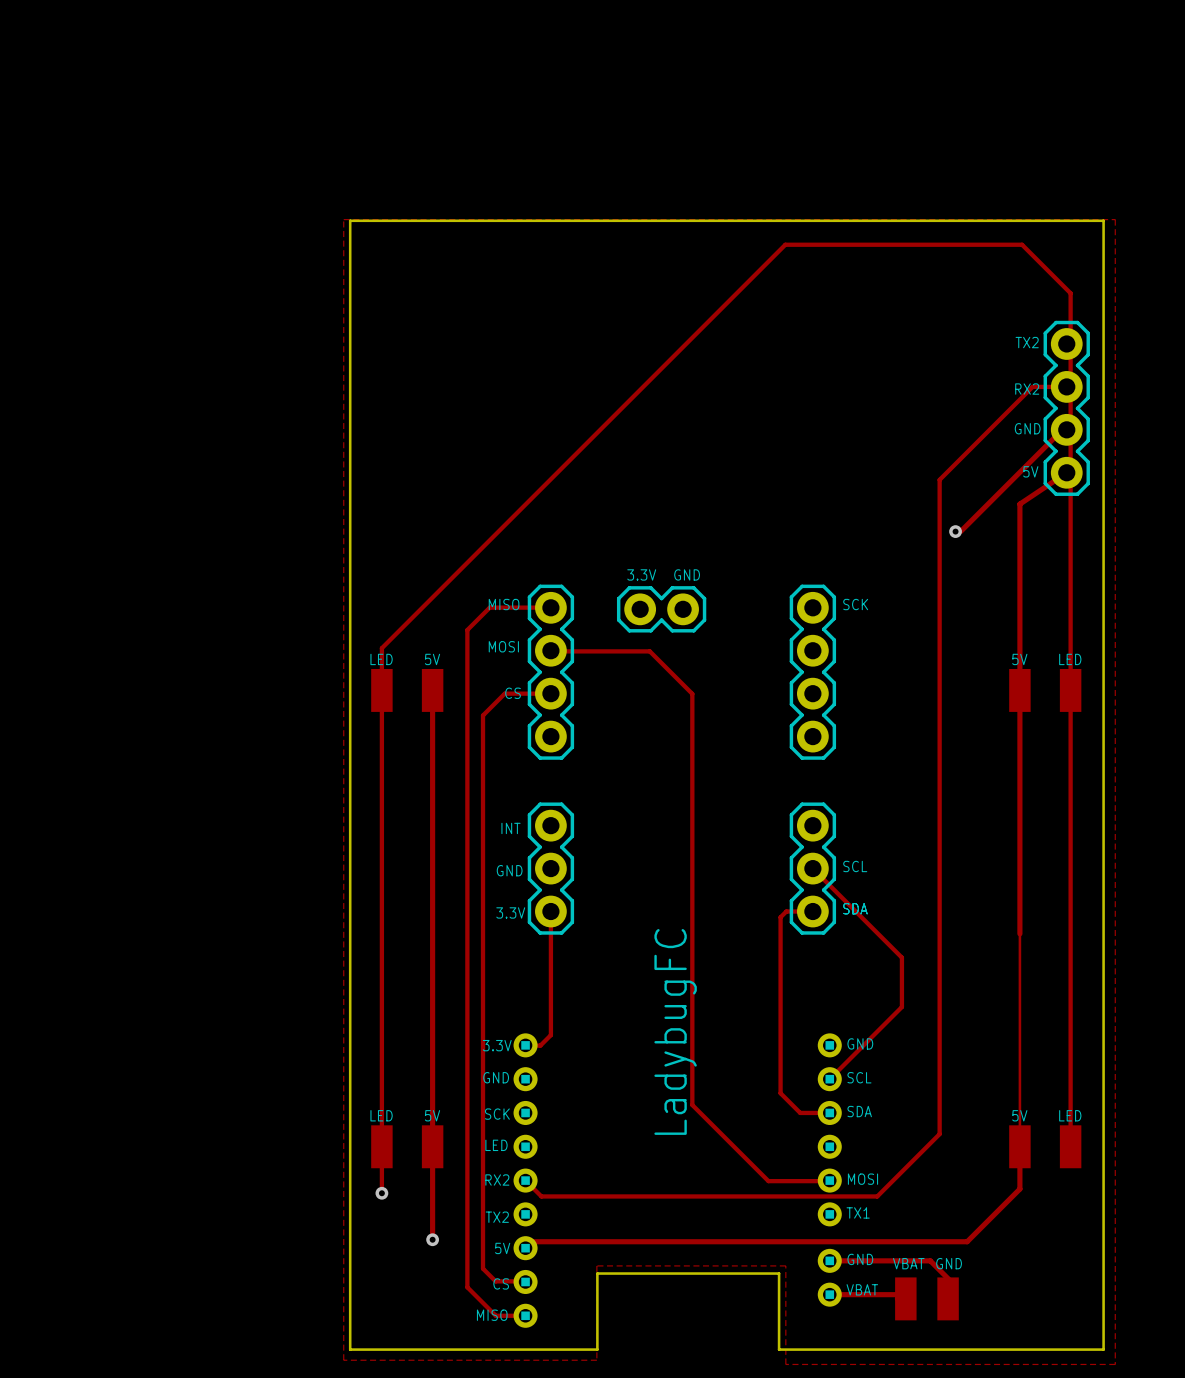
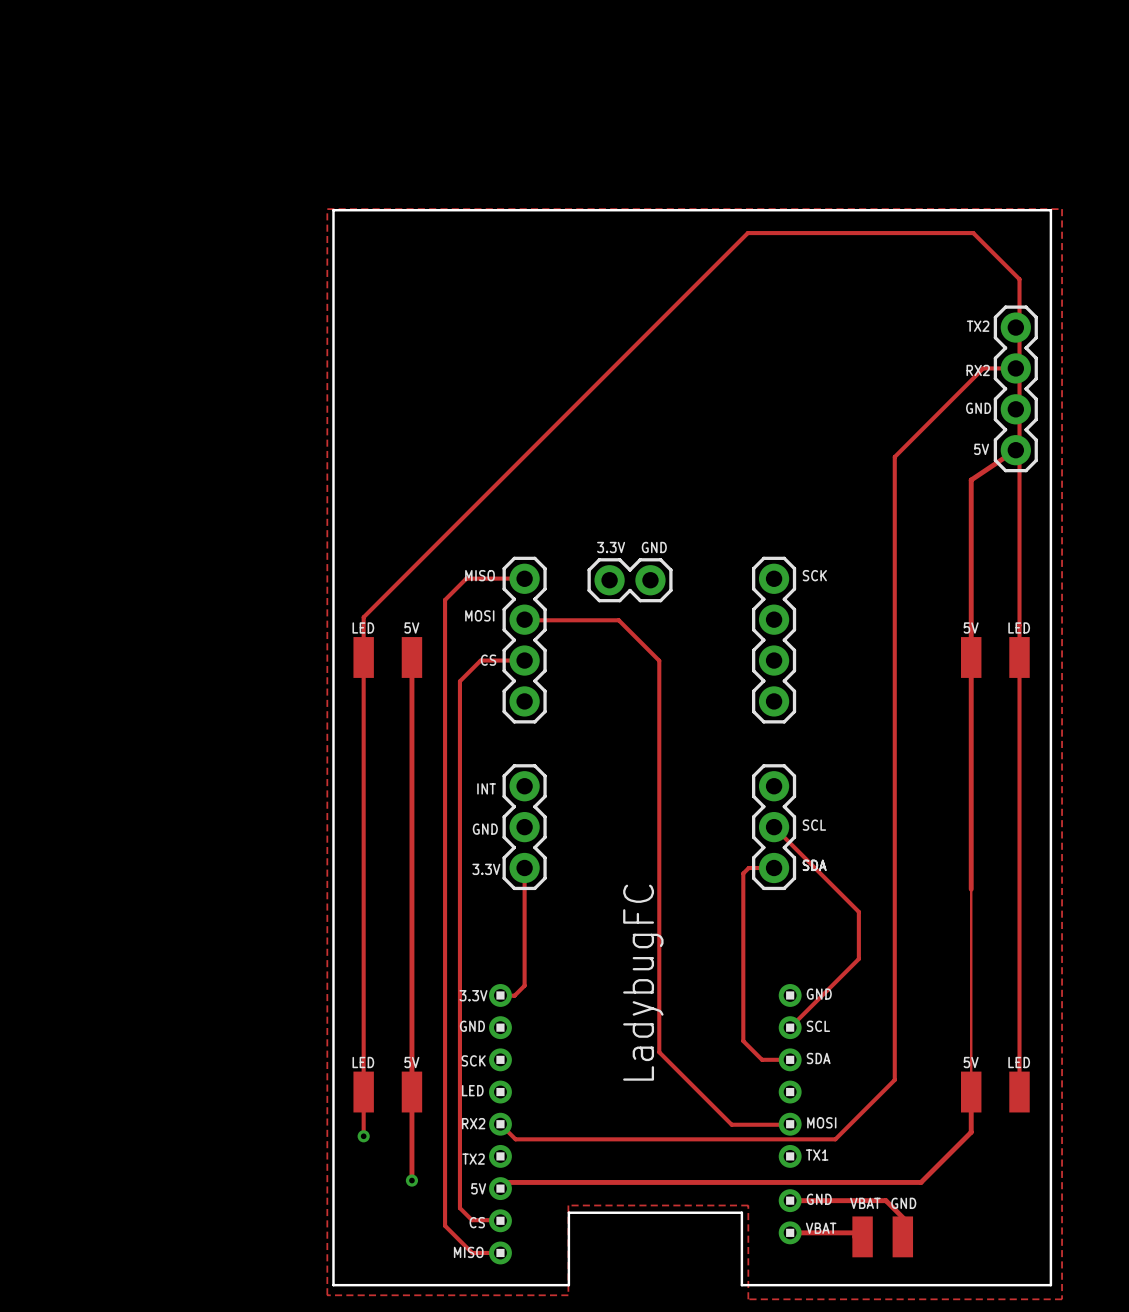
track: (1064, 429) (1062, 429) (960, 531) (955, 531) -> none
via: (955, 531) -> none

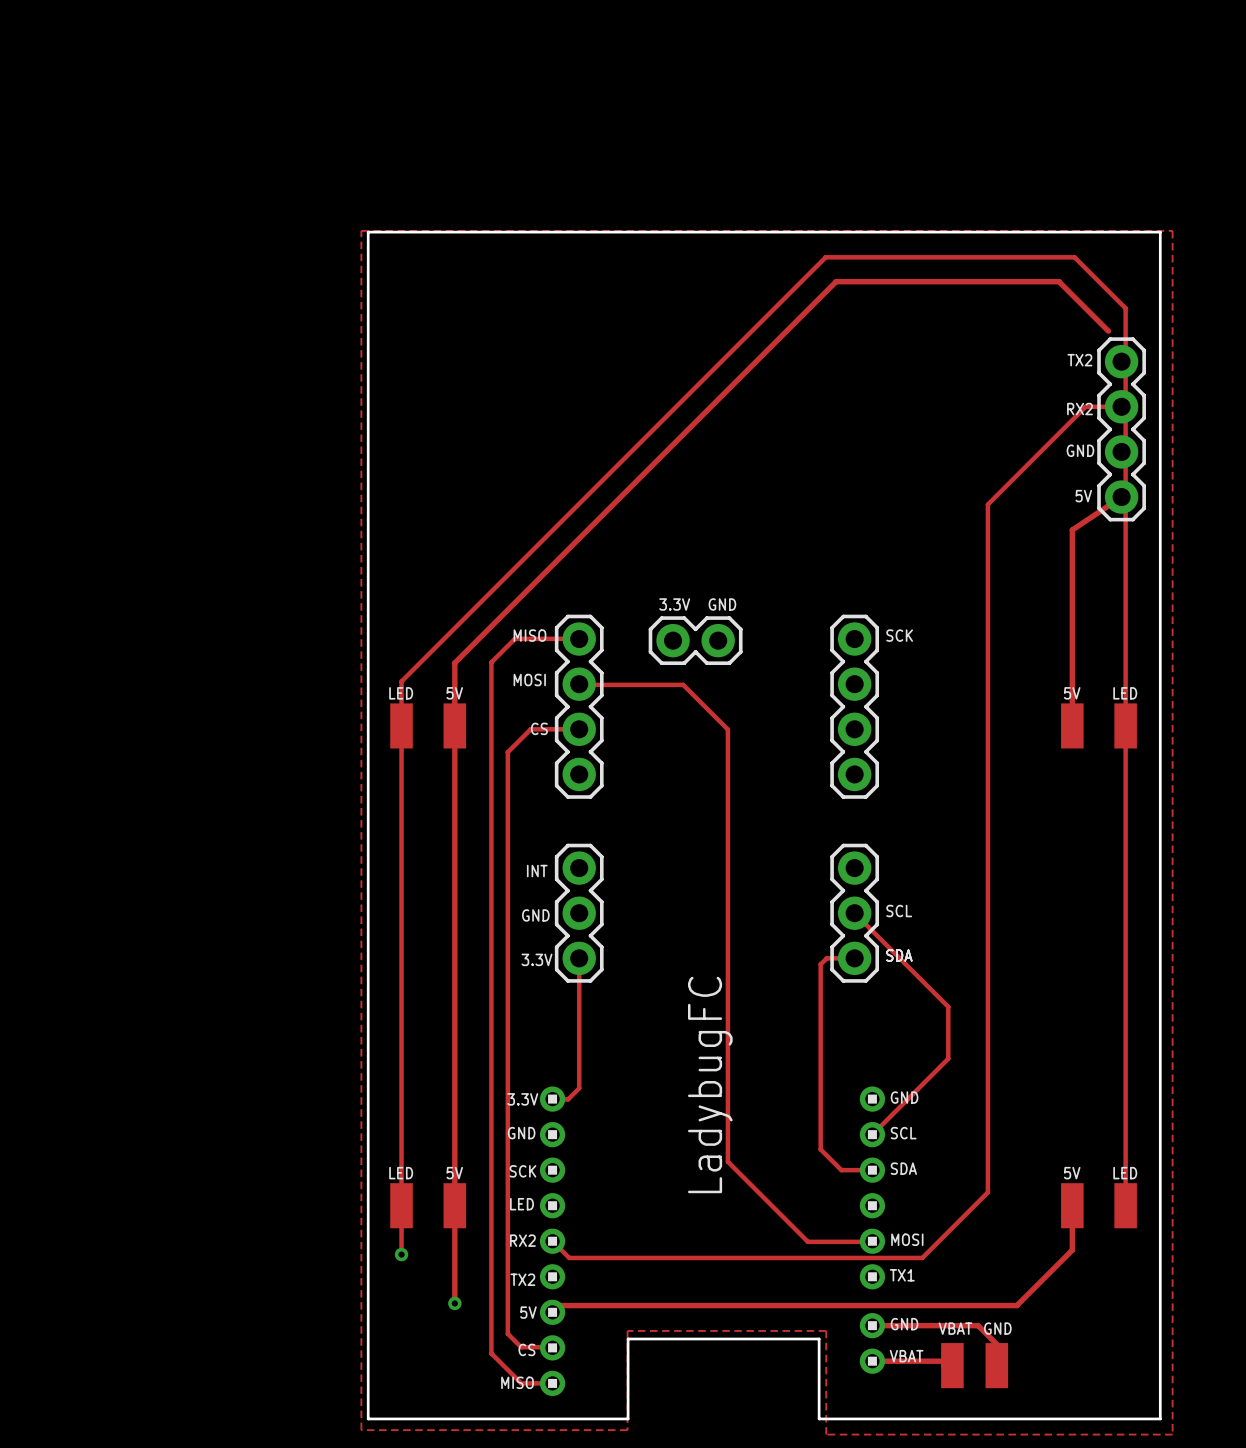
track: none -> (1108, 331) (1059, 281) (836, 281) (454, 662) (454, 725)
track: (971, 657) (971, 1092) -> none

